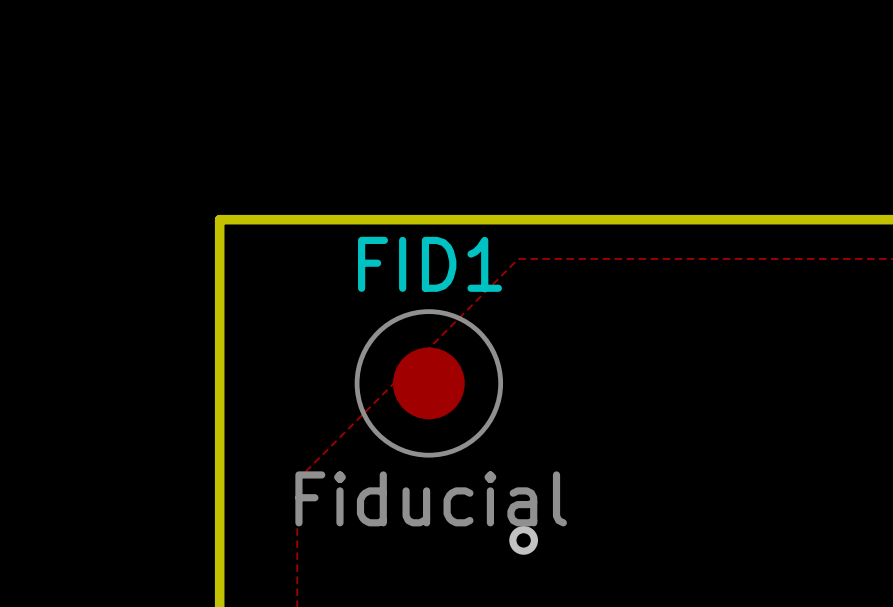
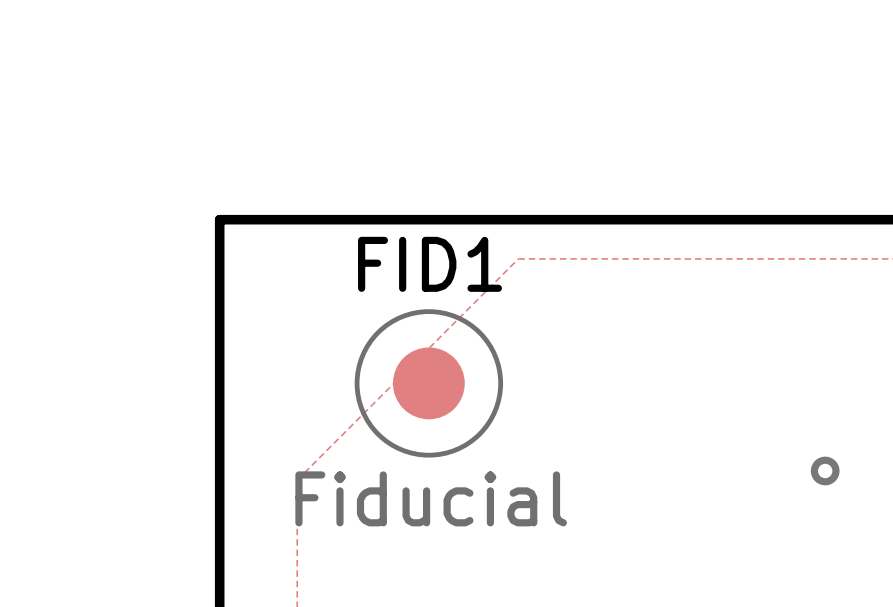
via: none -> (825, 470)
via: (523, 540) -> none

